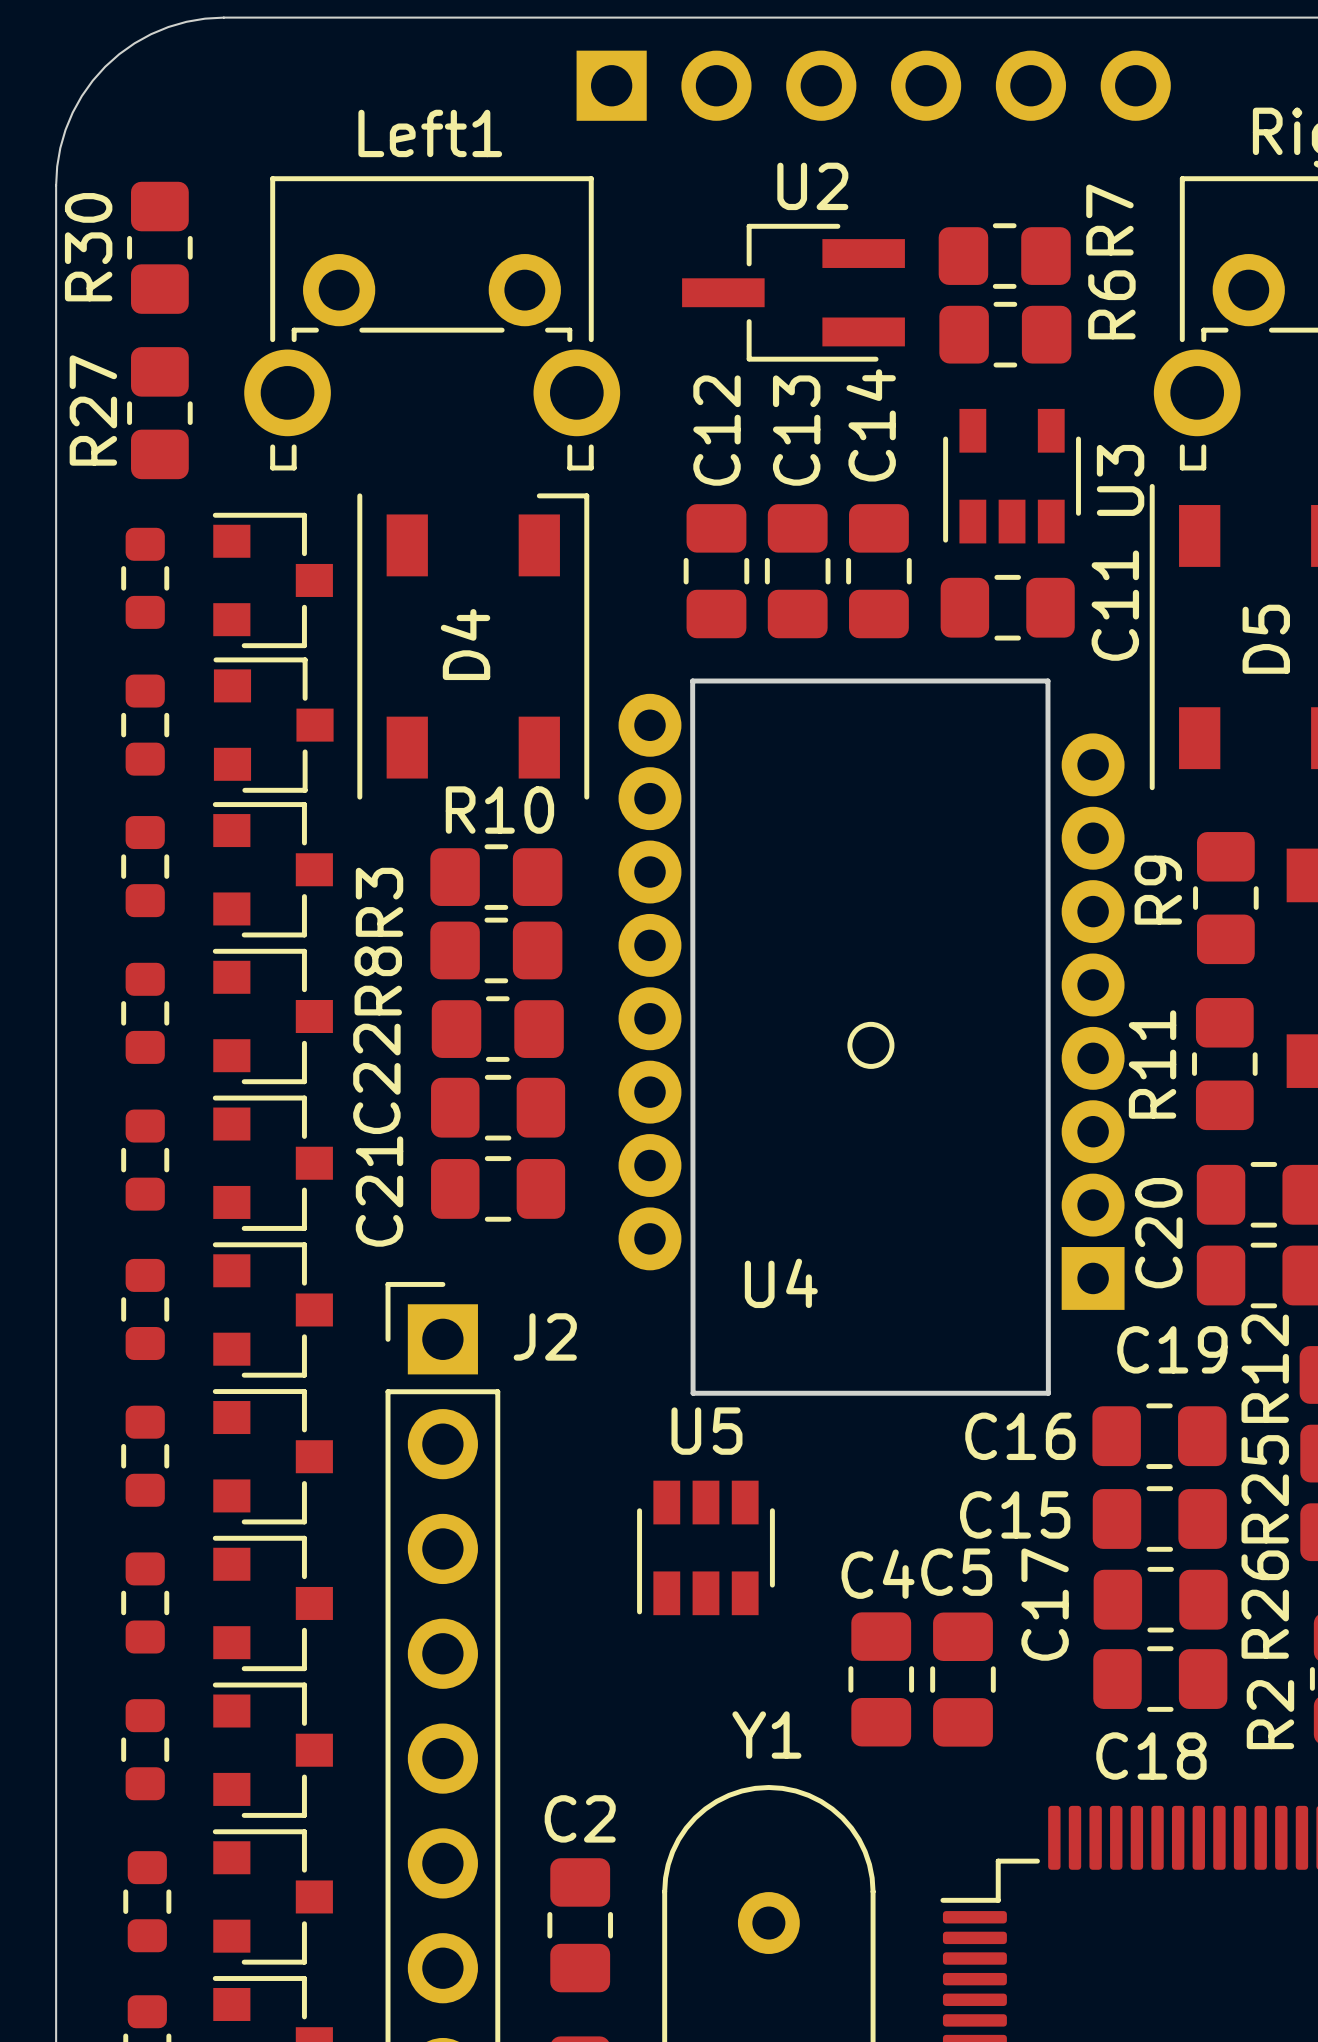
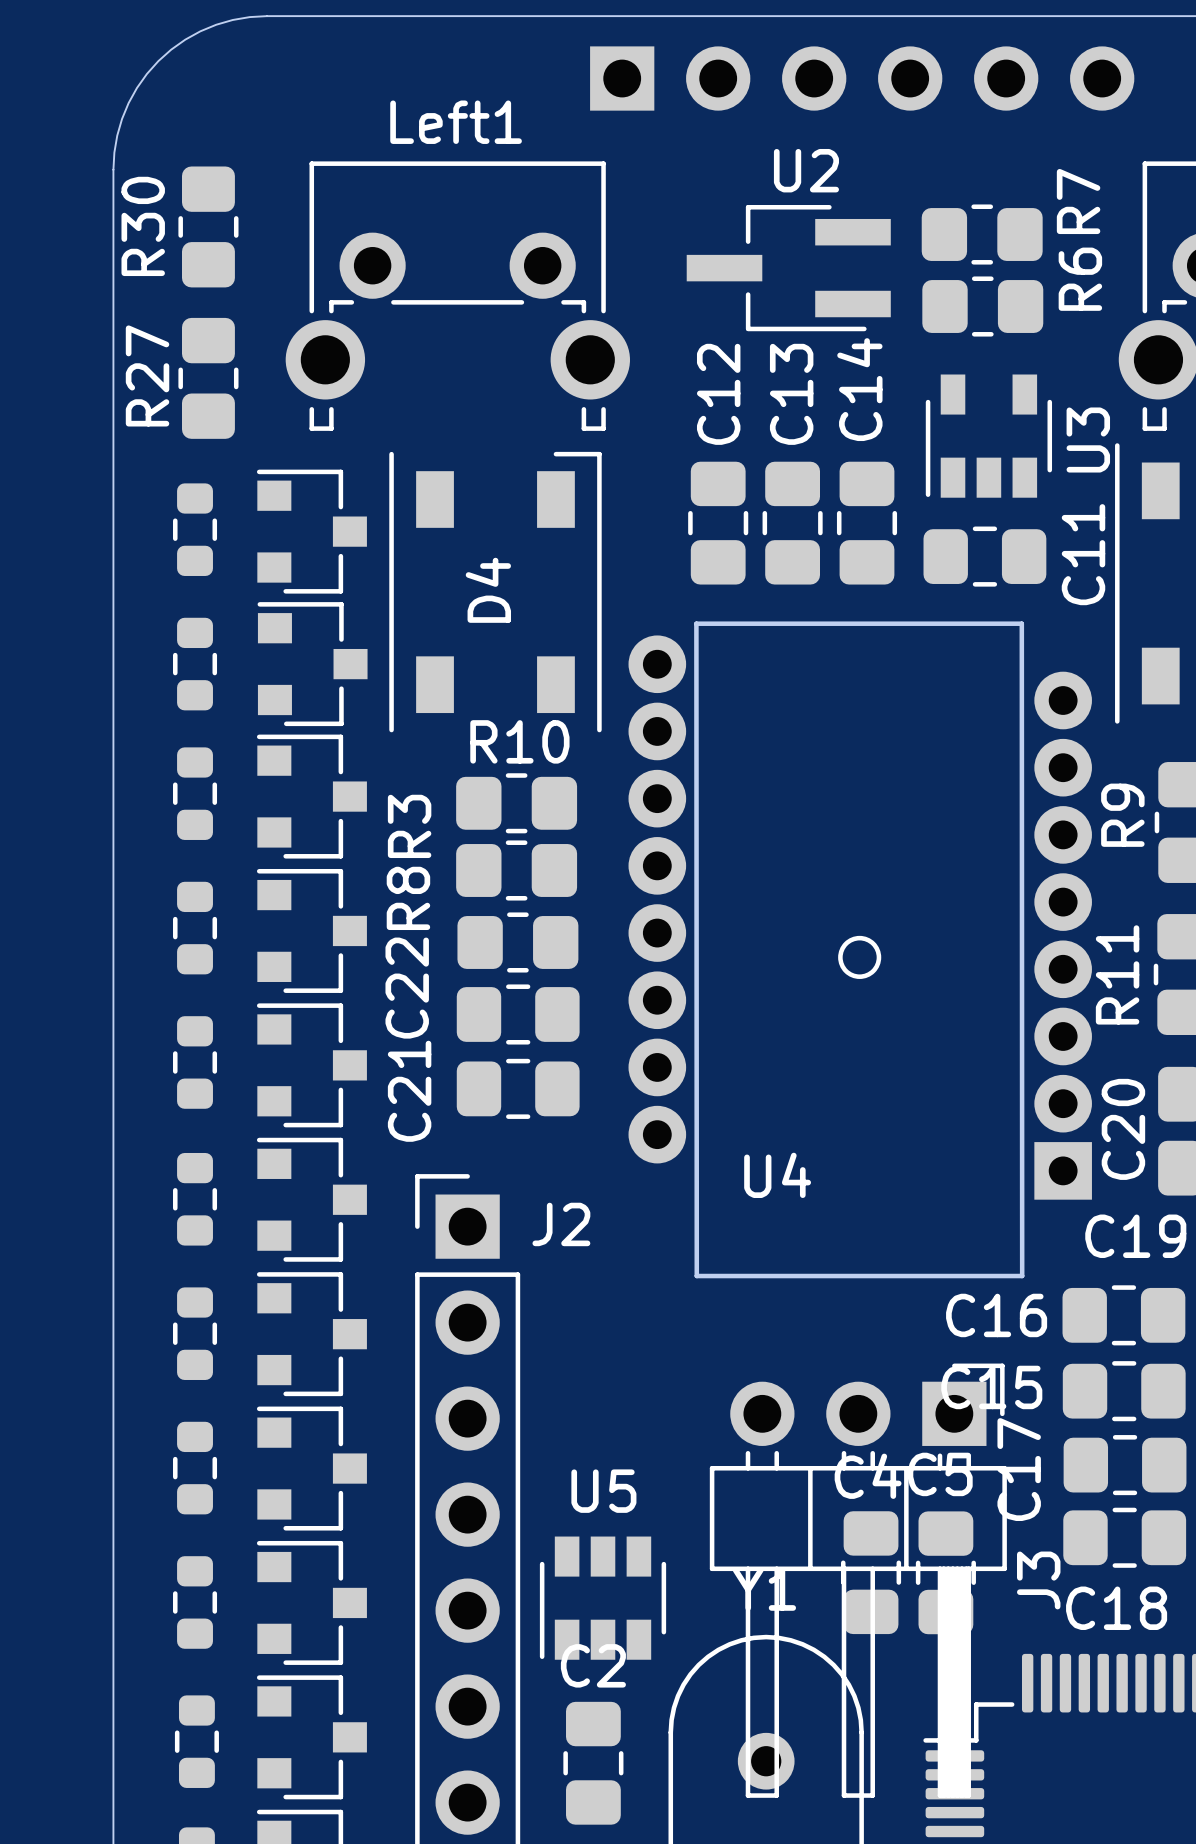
U5 position: (705, 1547) -> (603, 1598)
C4 position: (881, 1679) -> (871, 1572)
C5 position: (962, 1679) -> (945, 1572)
J3: none -> (858, 1580)

